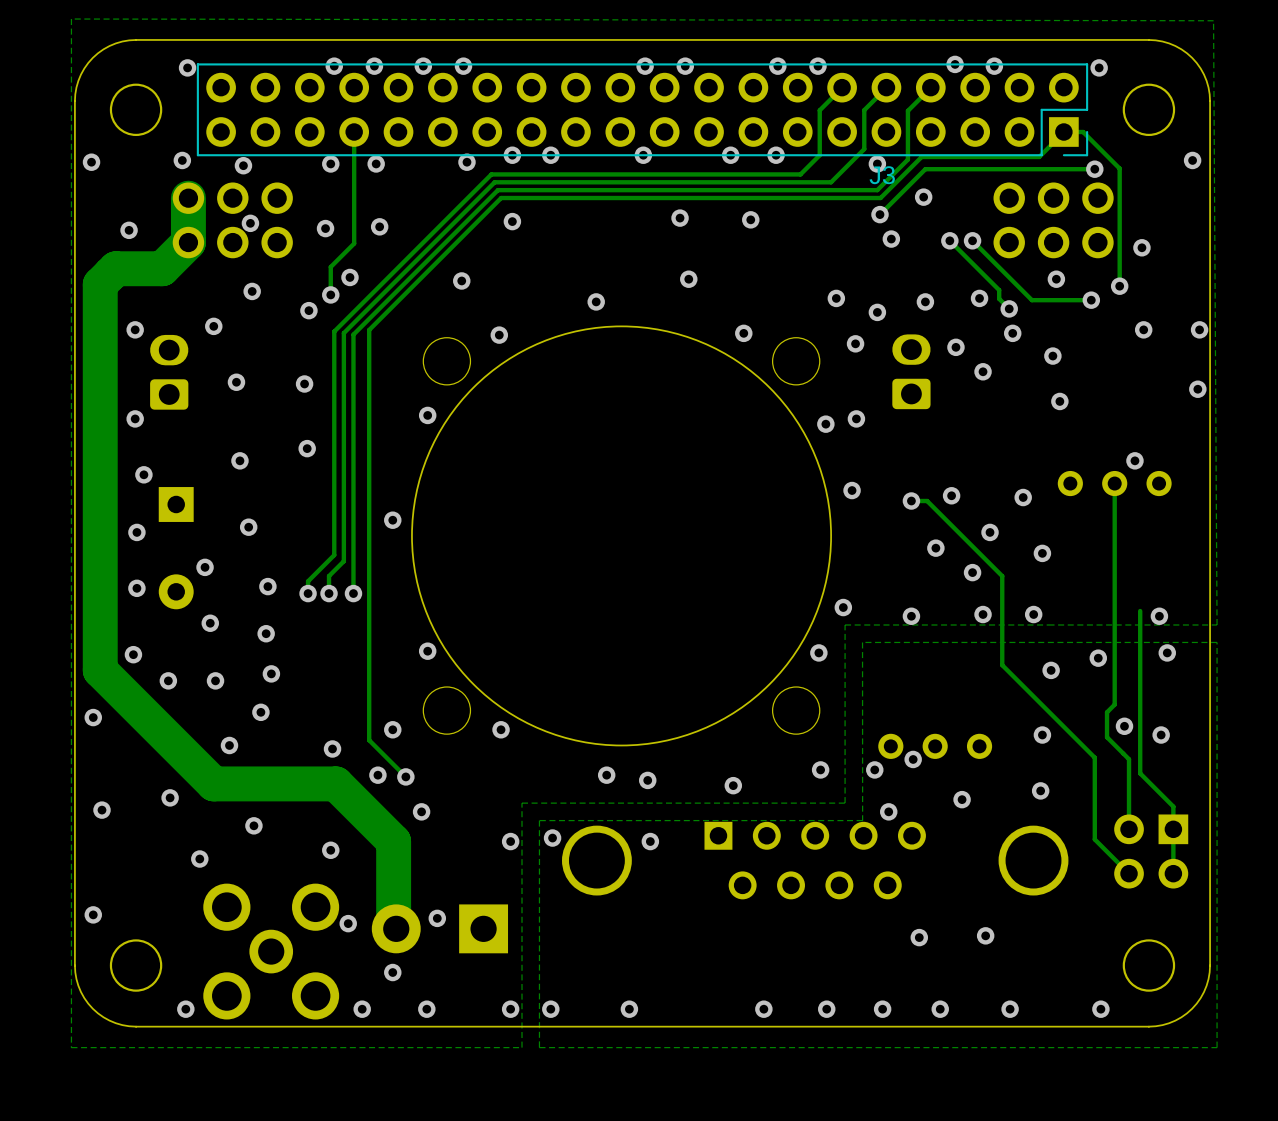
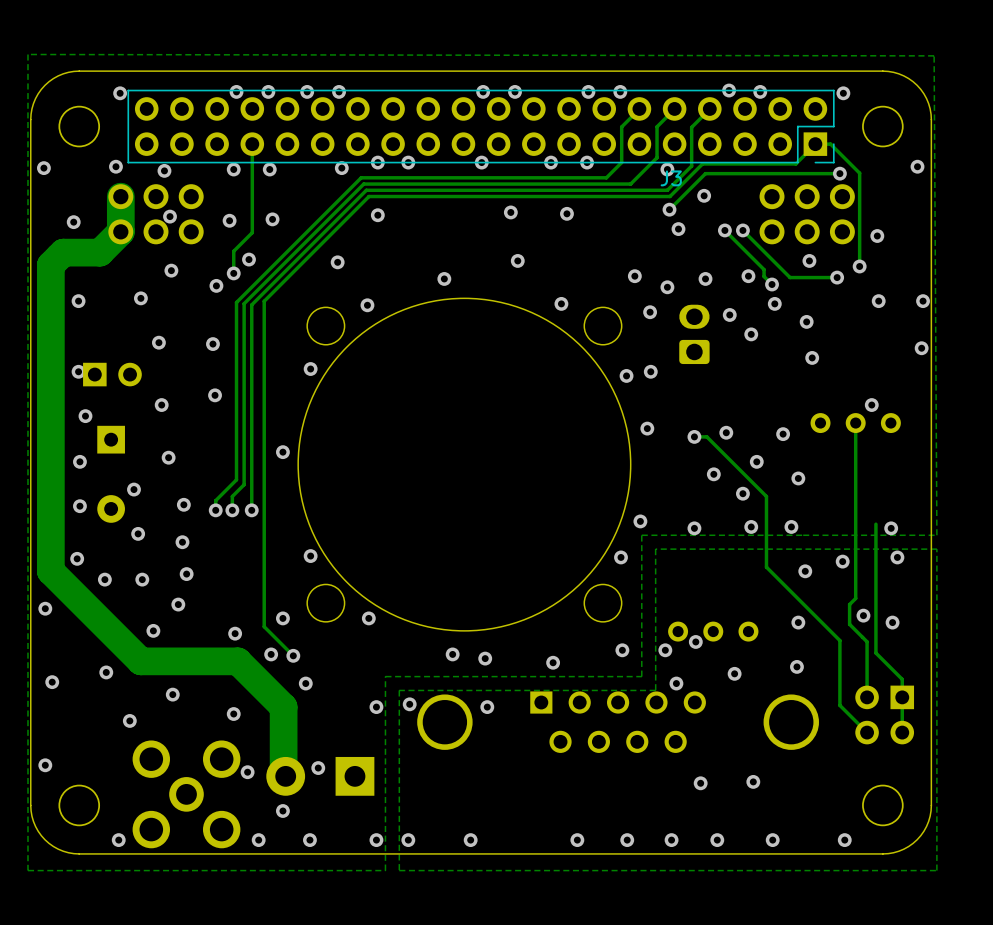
part: (169, 372) -> none
part: none -> (112, 374)

